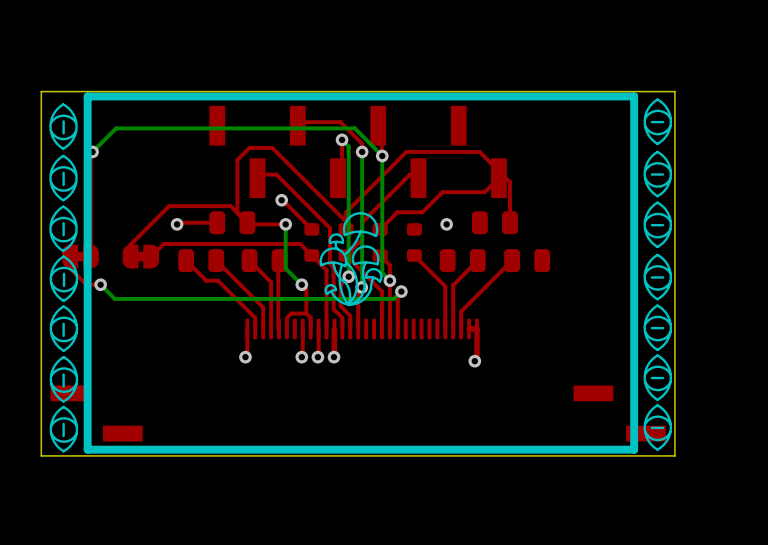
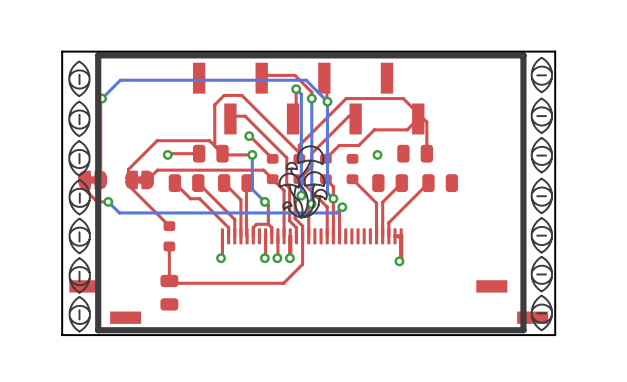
top track: (169, 206) (130, 244) (130, 256) -> (161, 140) (157, 140) (128, 169) (128, 185) (169, 226)
part: none -> (169, 236)
top track: none -> (302, 236) (302, 264) (283, 283) (171, 283) (169, 280) (169, 246)
part: none -> (169, 292)

